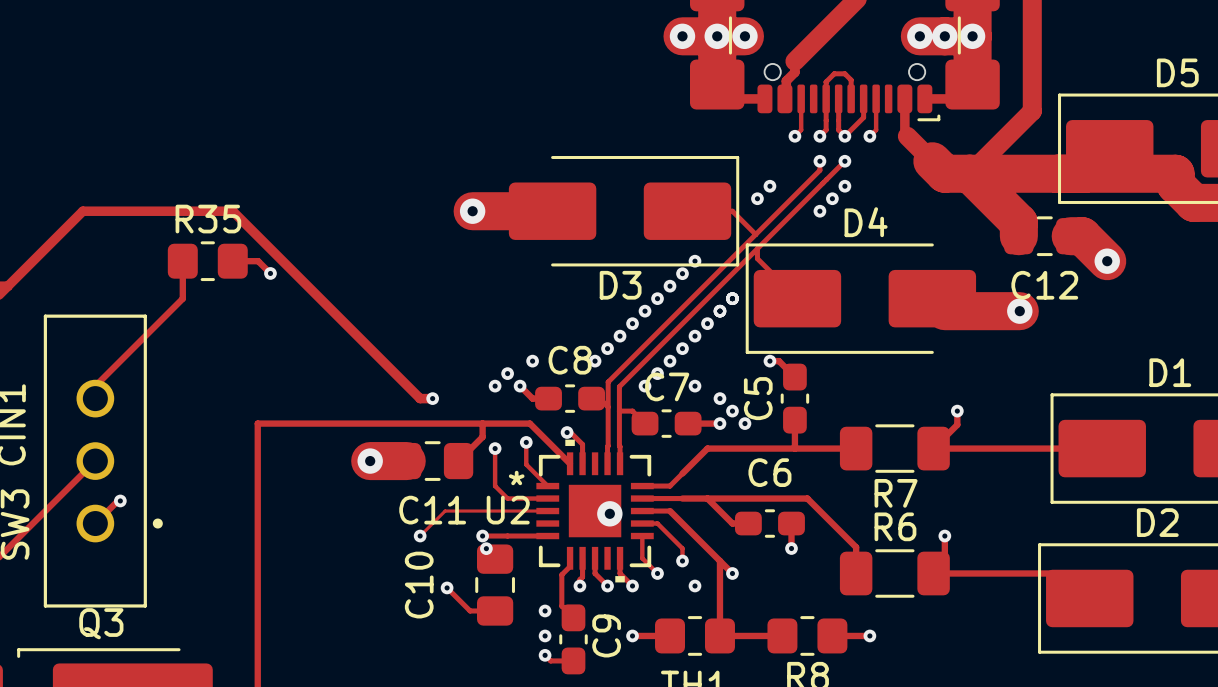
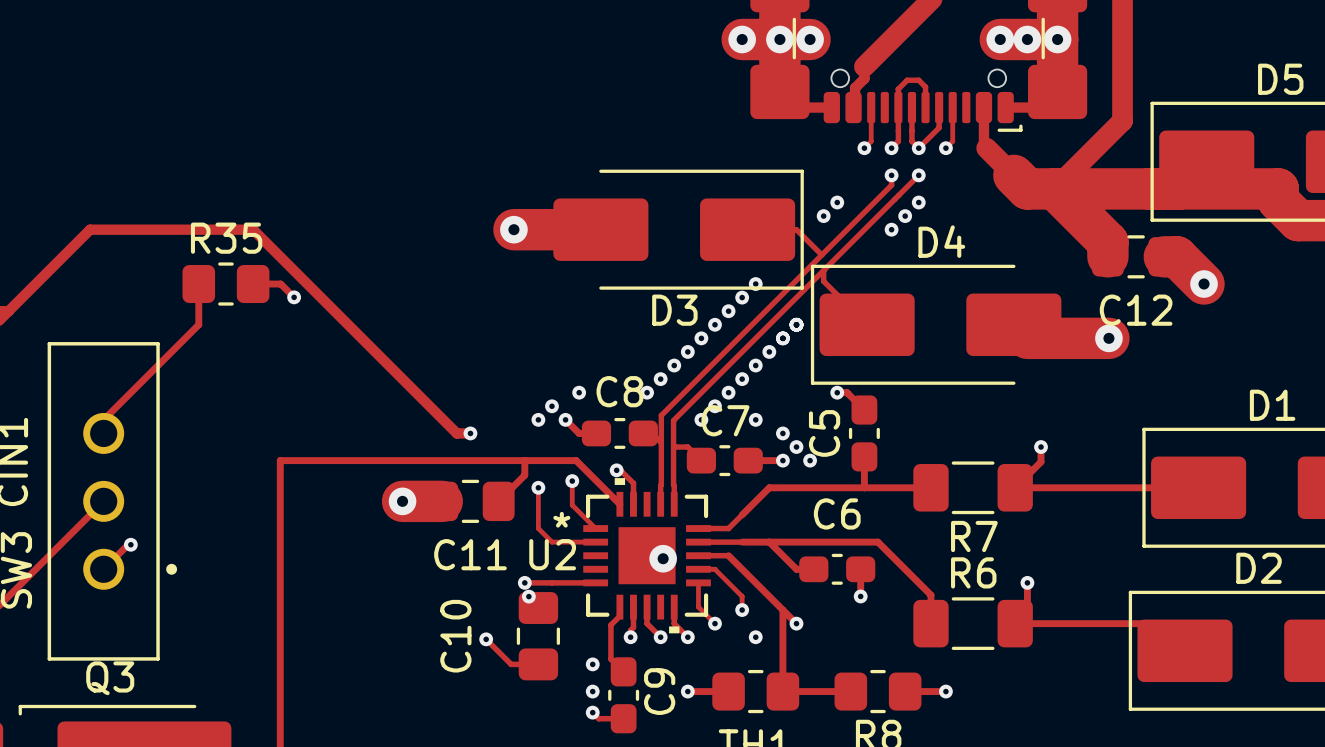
track: (547, 511) (445, 511) (420, 536) -> none
via: (420, 536) -> none

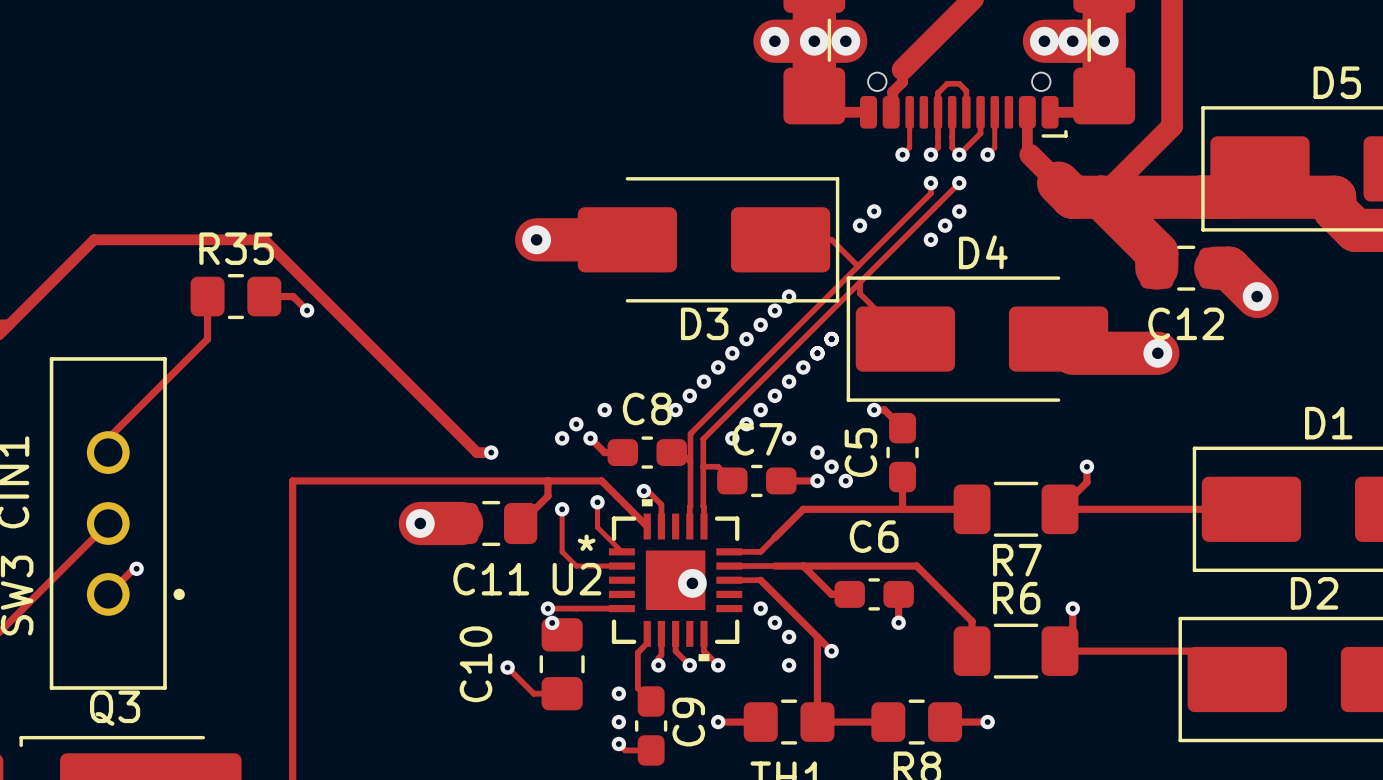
track: (698, 569) (714, 569) (742, 596) (742, 610) -> none
track: (698, 582) (698, 607) (714, 623) -> none
via: none -> (760, 608)
via: none -> (774, 622)
via: (742, 610) -> none
via: none -> (789, 636)
via: (714, 623) -> none

